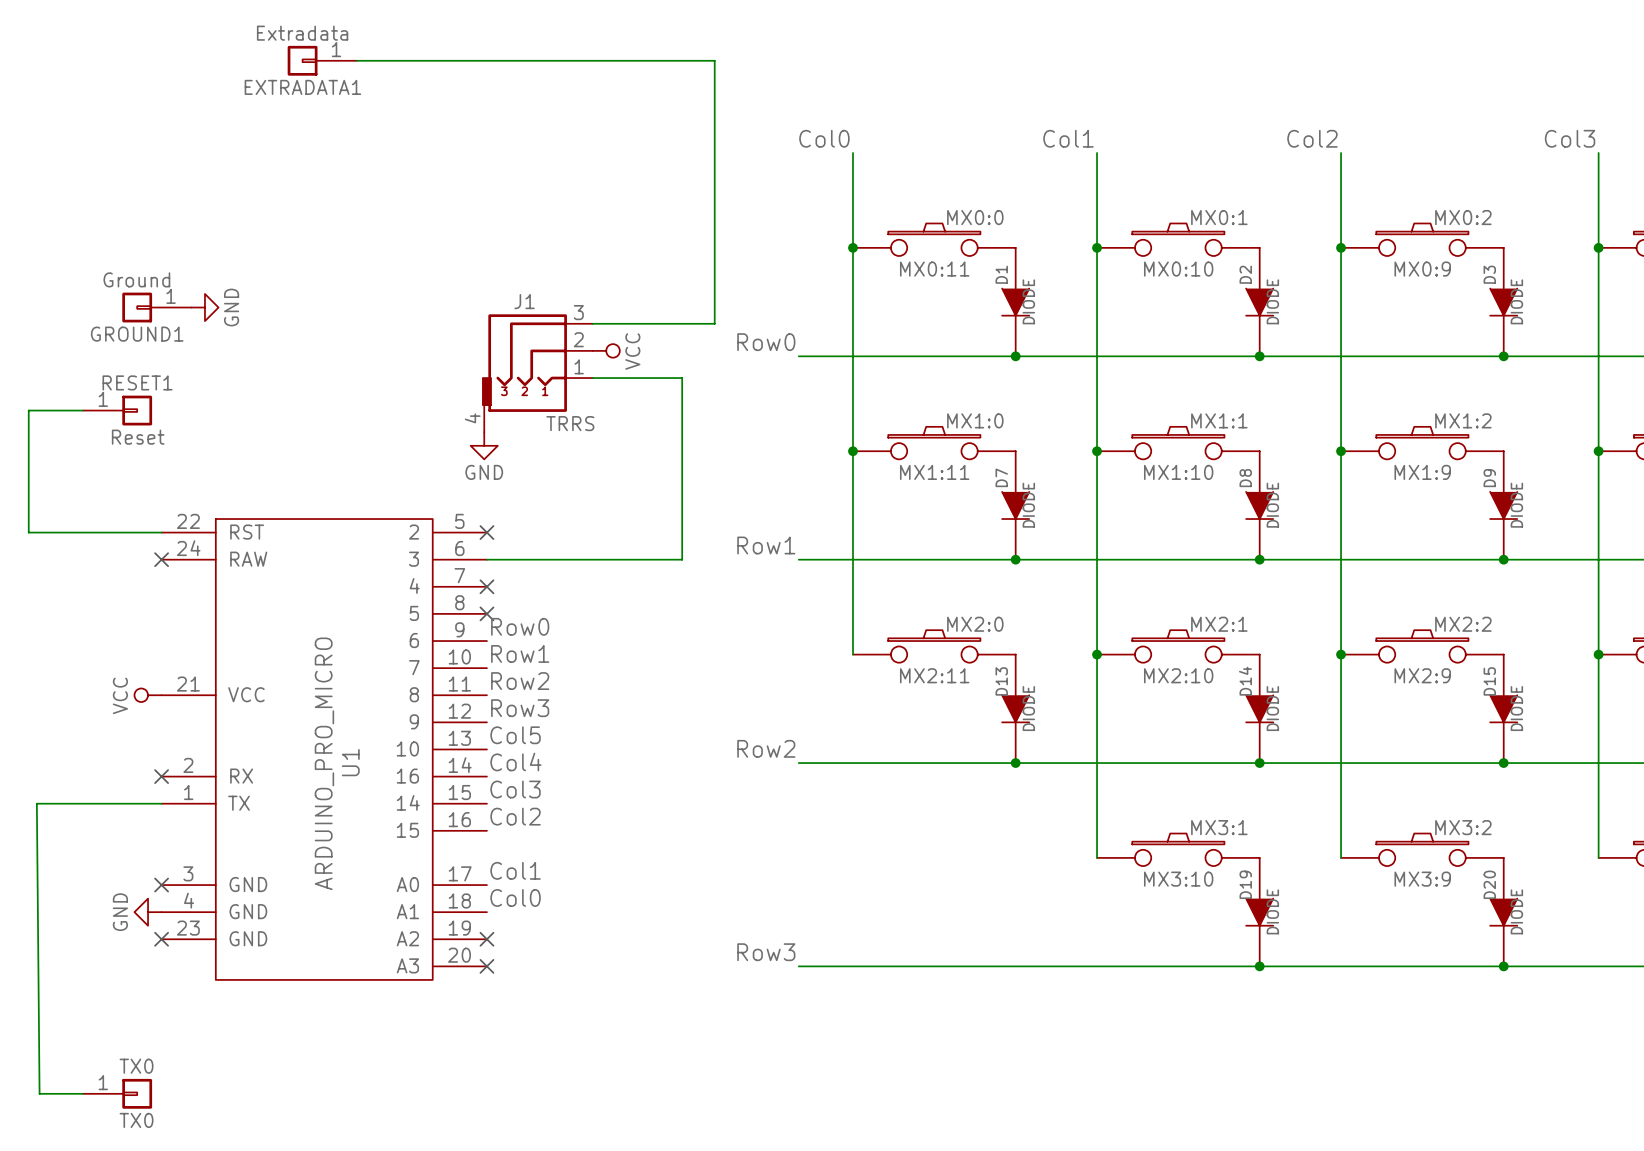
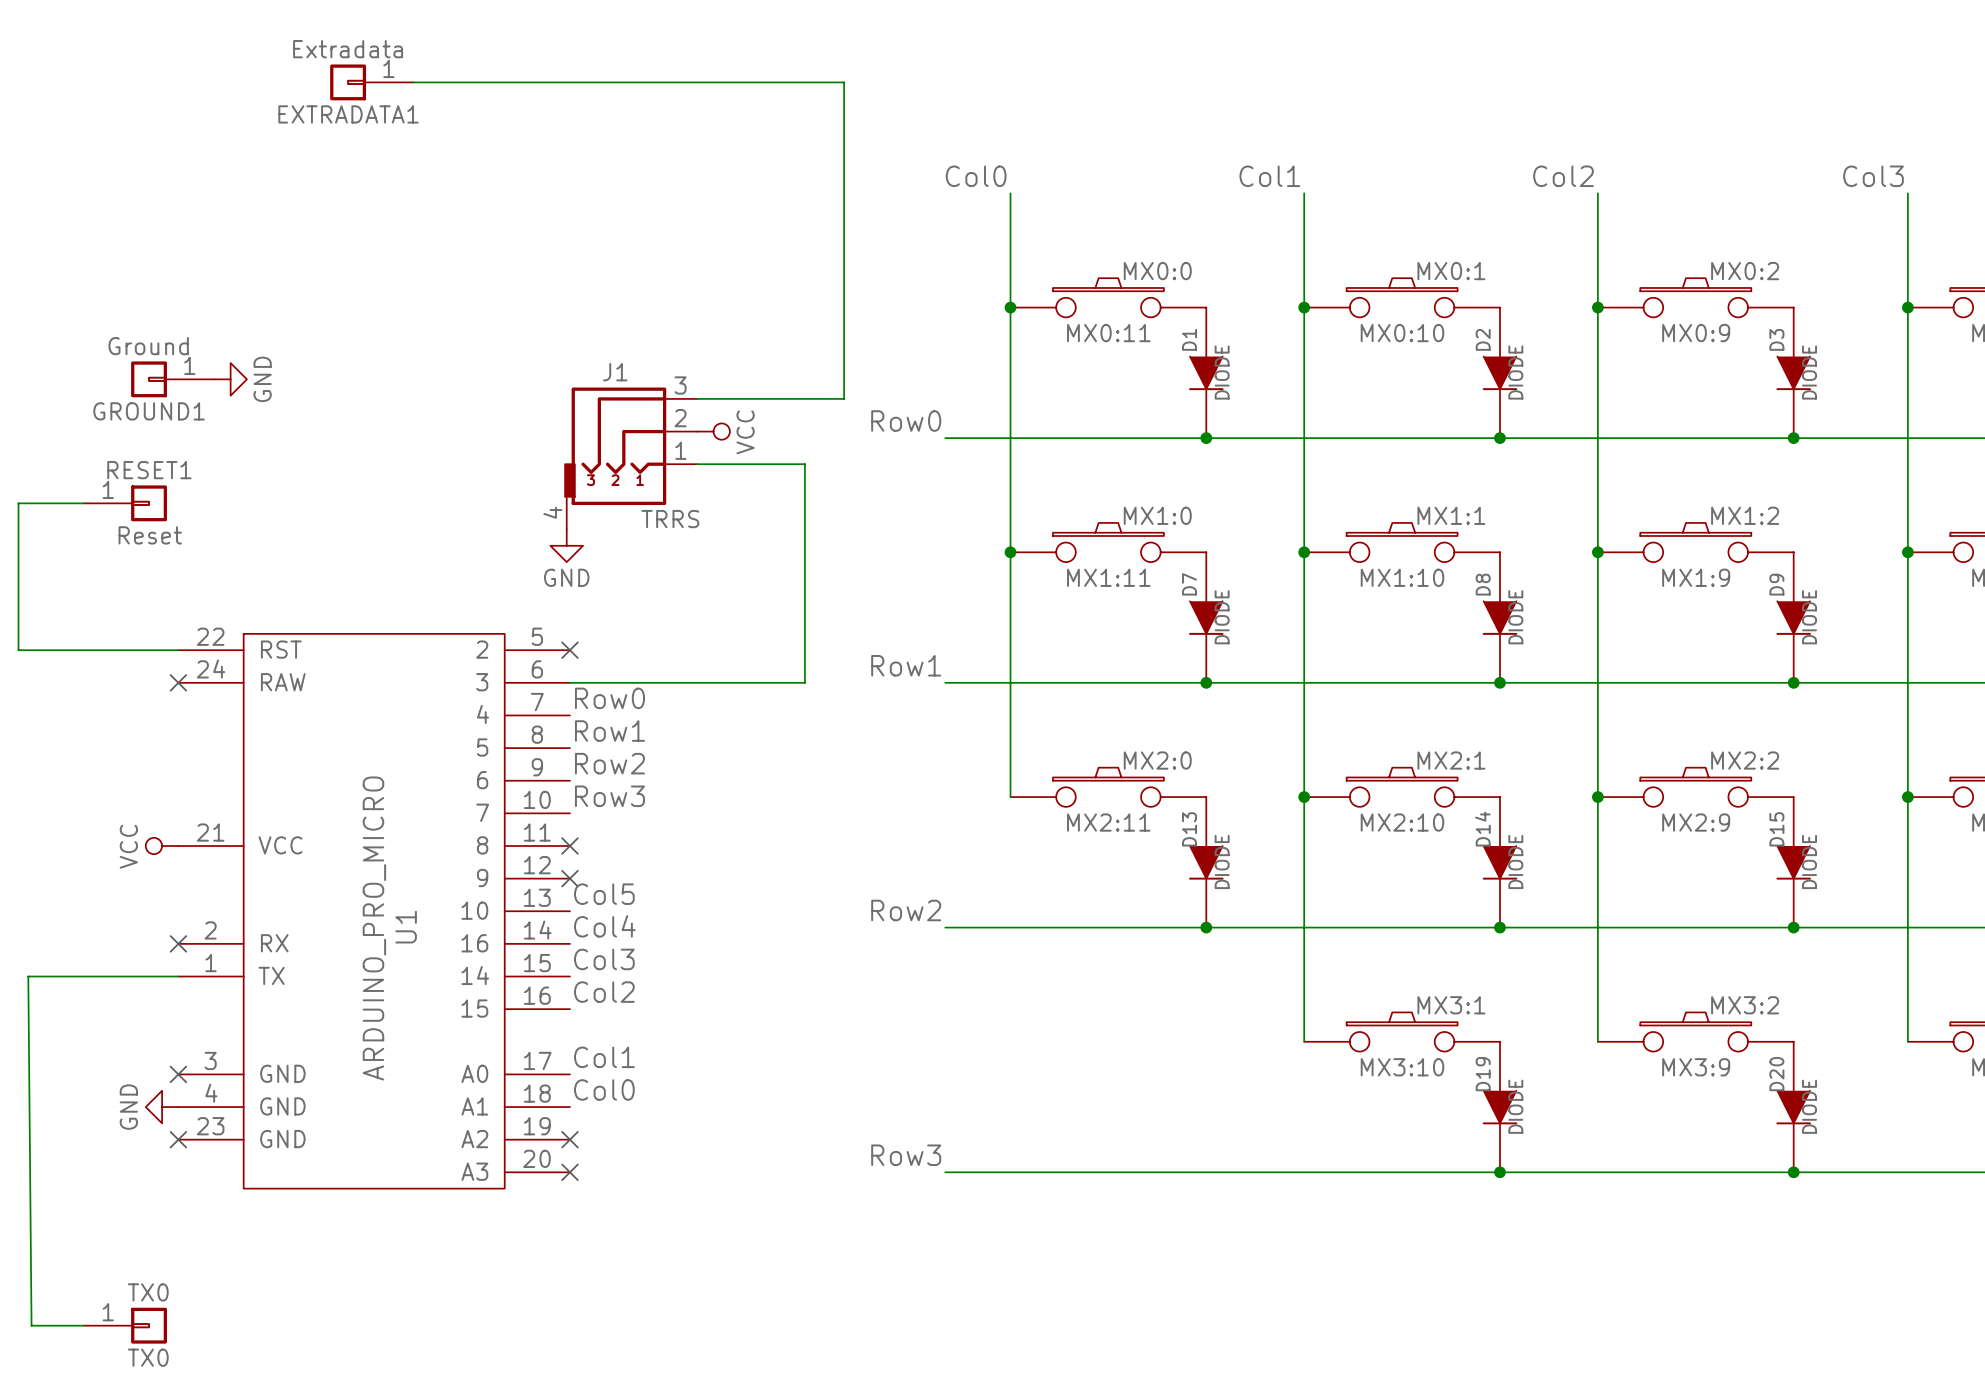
label: none -> Row0 (609, 698)
no-connect mark: (486, 586) -> none
label: none -> Row1 (609, 731)
no-connect mark: (486, 613) -> none
label: Row0 (520, 626) -> Row2 (609, 763)
label: Row1 (520, 653) -> Row3 (609, 796)
label: Row2 (520, 681) -> none
no-connect mark: none -> (569, 845)
label: Row3 (520, 708) -> none
no-connect mark: none -> (569, 878)

